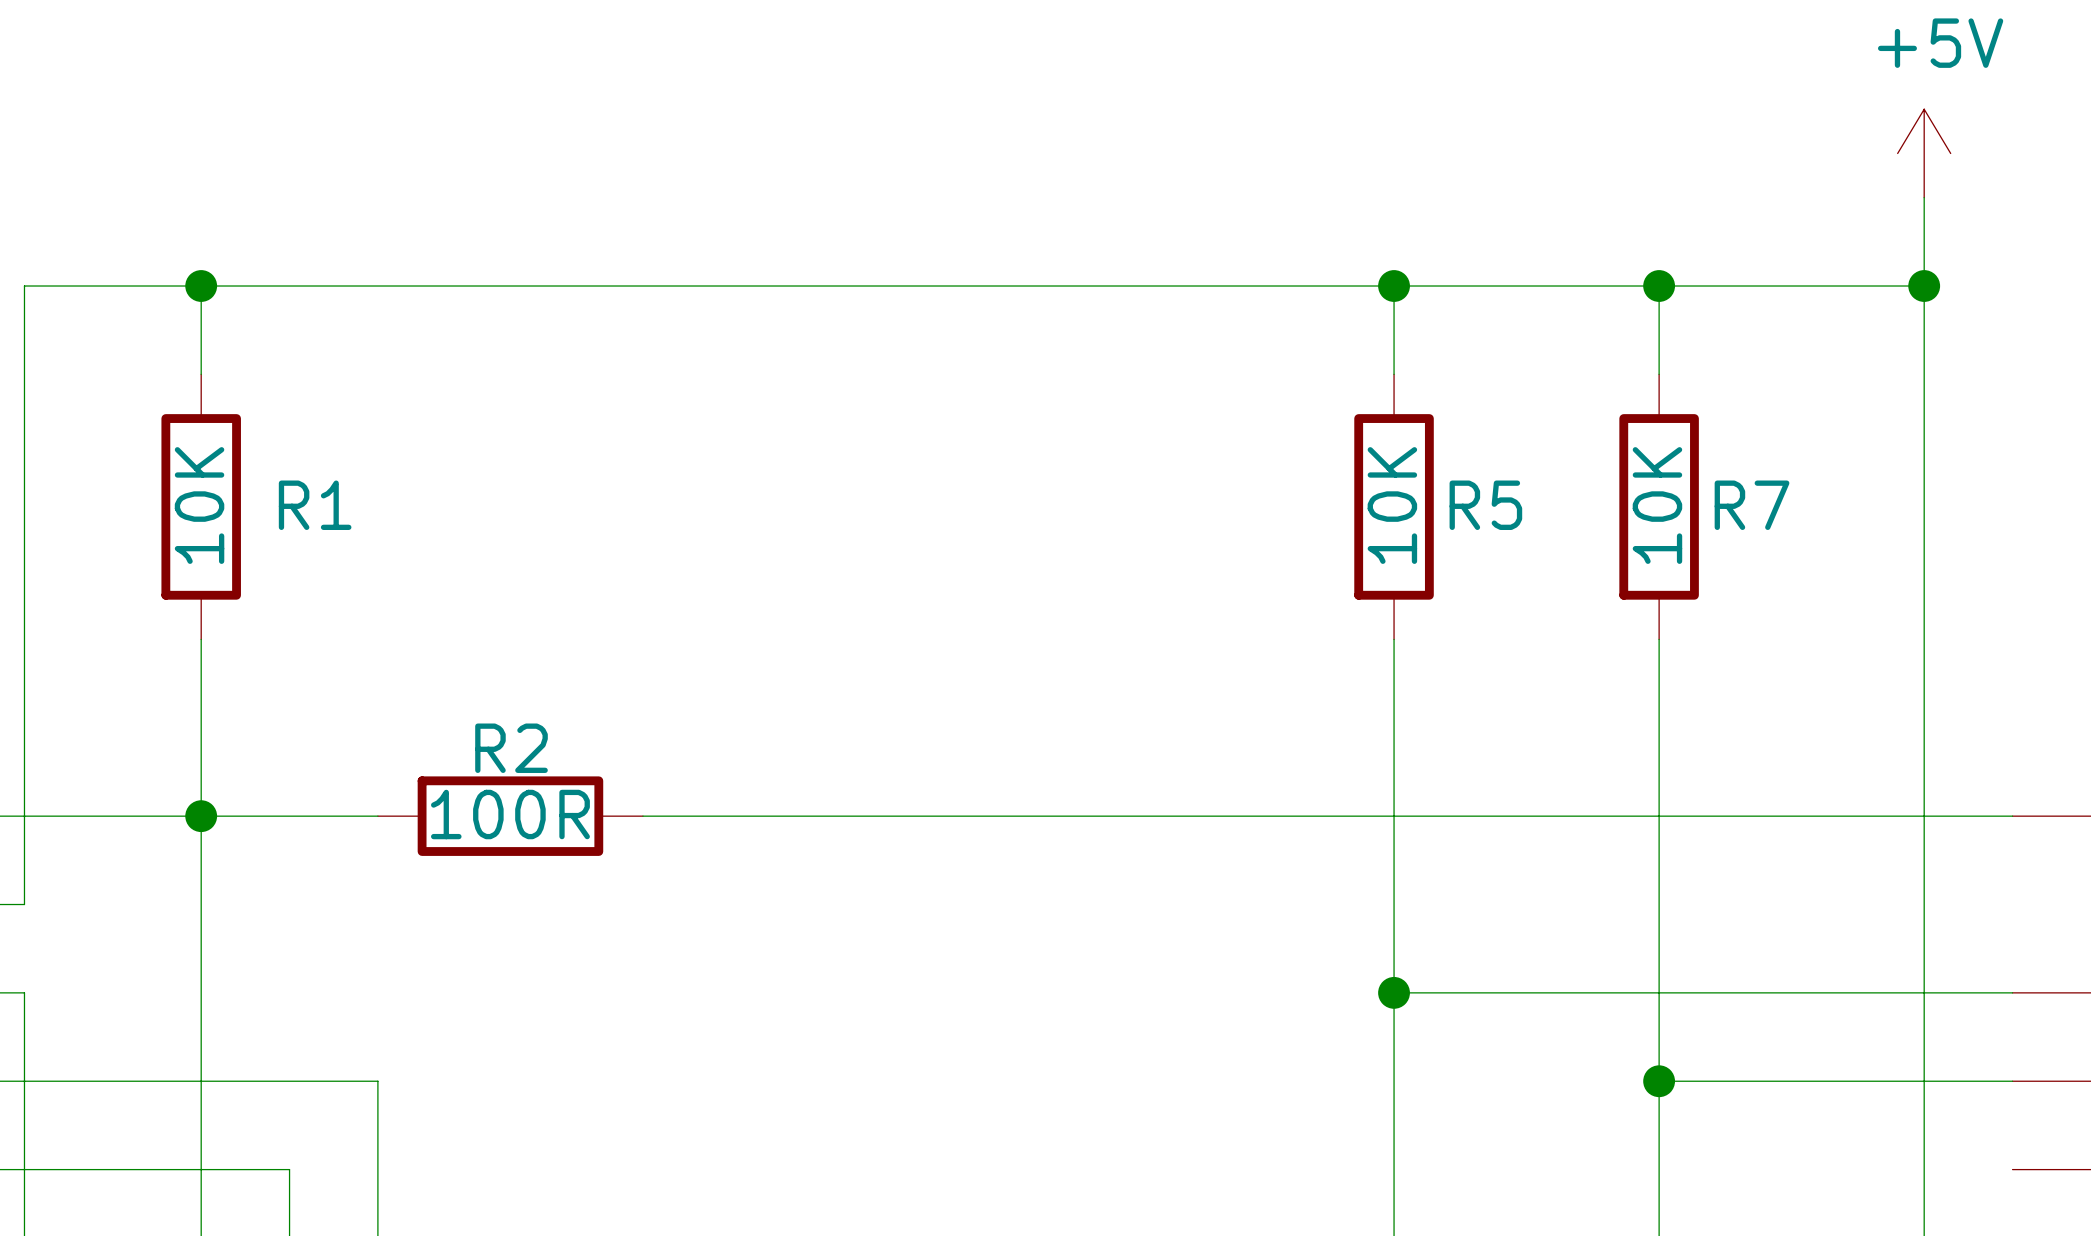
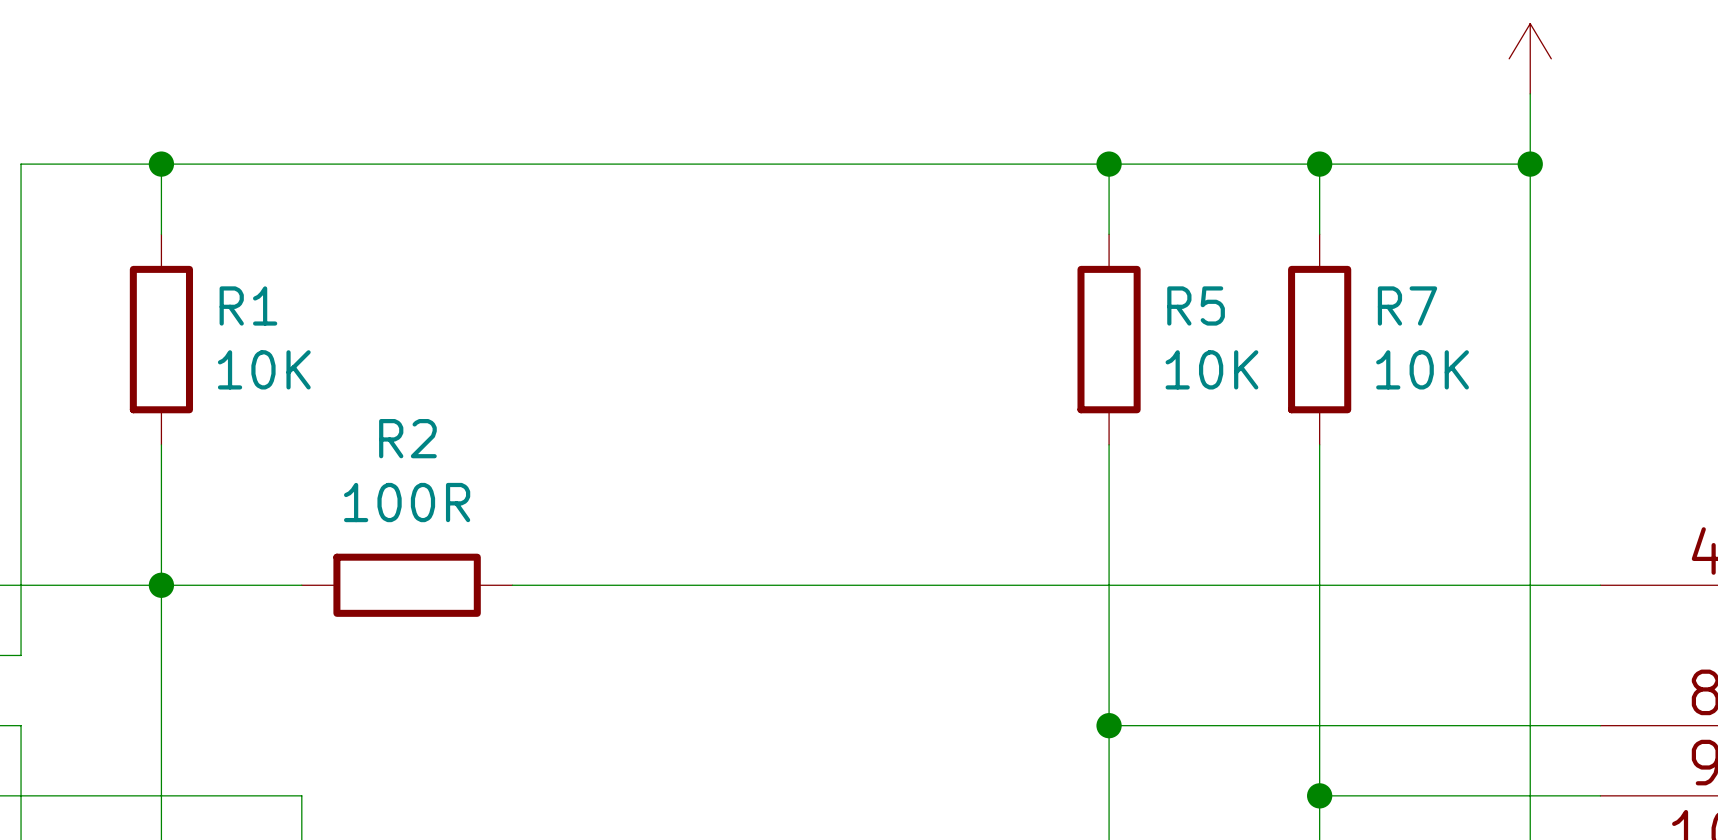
R1 value rotation: 0° (199, 505) -> 90° clockwise (264, 369)
R1 name position: R1 (315, 505) -> R1 (248, 305)
R5 value rotation: 0° (1392, 505) -> 90° clockwise (1211, 369)
R5 name position: R5 (1485, 505) -> R5 (1196, 305)
R7 value rotation: 0° (1657, 505) -> 90° clockwise (1422, 369)
R7 name position: R7 (1752, 505) -> R7 (1407, 305)
R2 name position: R2 (511, 748) -> R2 (407, 438)
R2 value position: 100R (510, 814) -> 100R (407, 502)

